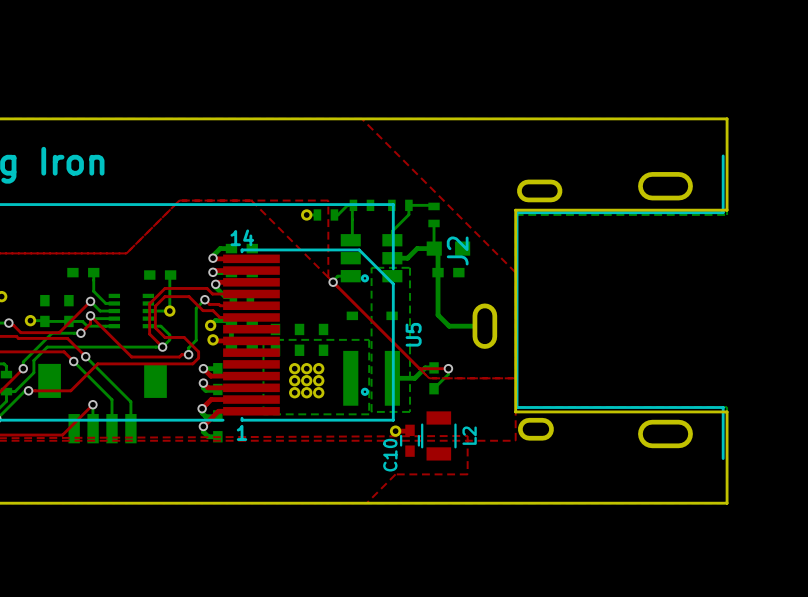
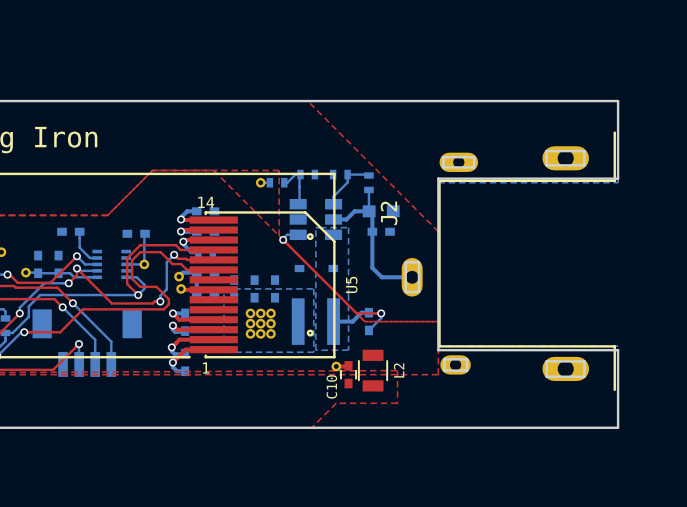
J2 footprint: [472, 154, 725, 460] -> [401, 131, 616, 392]
board edge: none -> (546, 151) (546, 165) (584, 165) (584, 151) (546, 151)
board edge: none -> (443, 157) (443, 167) (474, 167) (474, 157) (443, 157)
board edge: none -> (405, 262) (405, 291) (418, 291) (418, 262) (405, 262)
board edge: none -> (444, 359) (444, 370) (466, 370) (466, 359) (444, 359)
board edge: none -> (546, 361) (546, 376) (584, 376) (584, 361) (546, 361)

